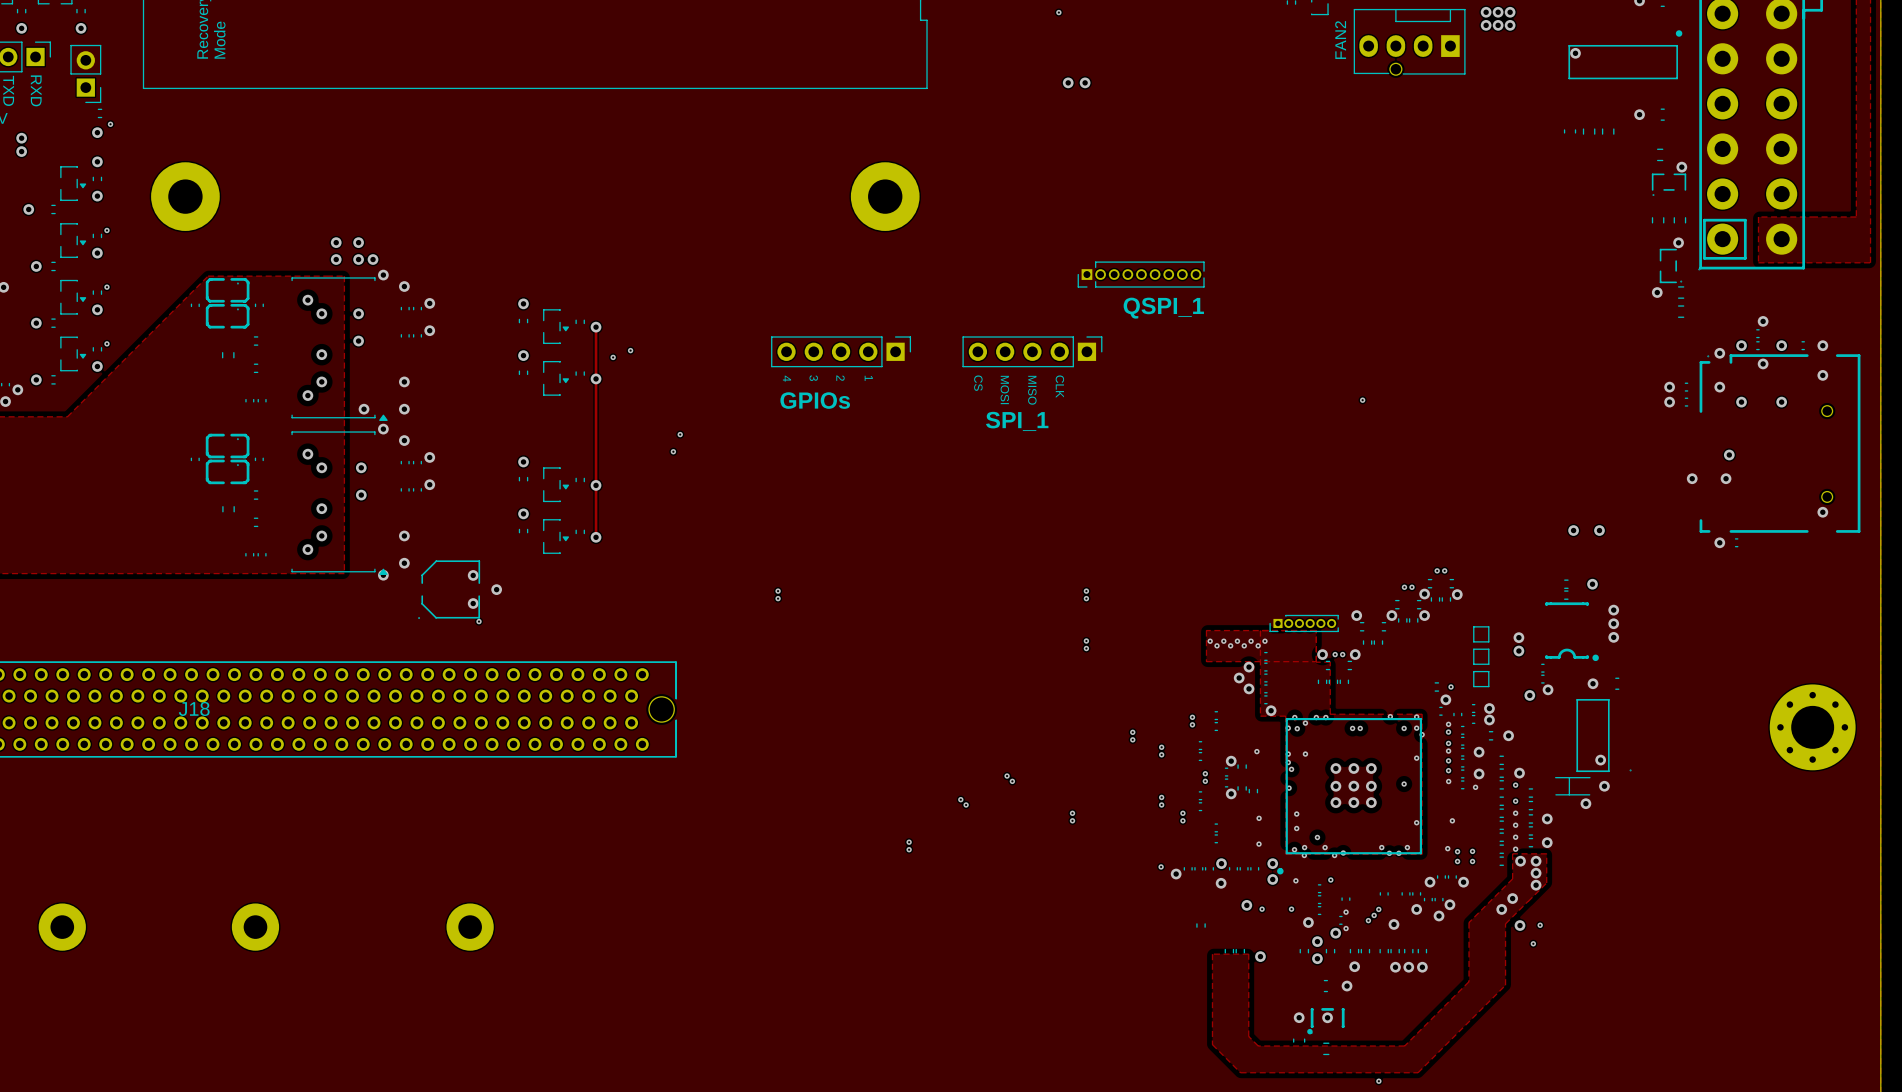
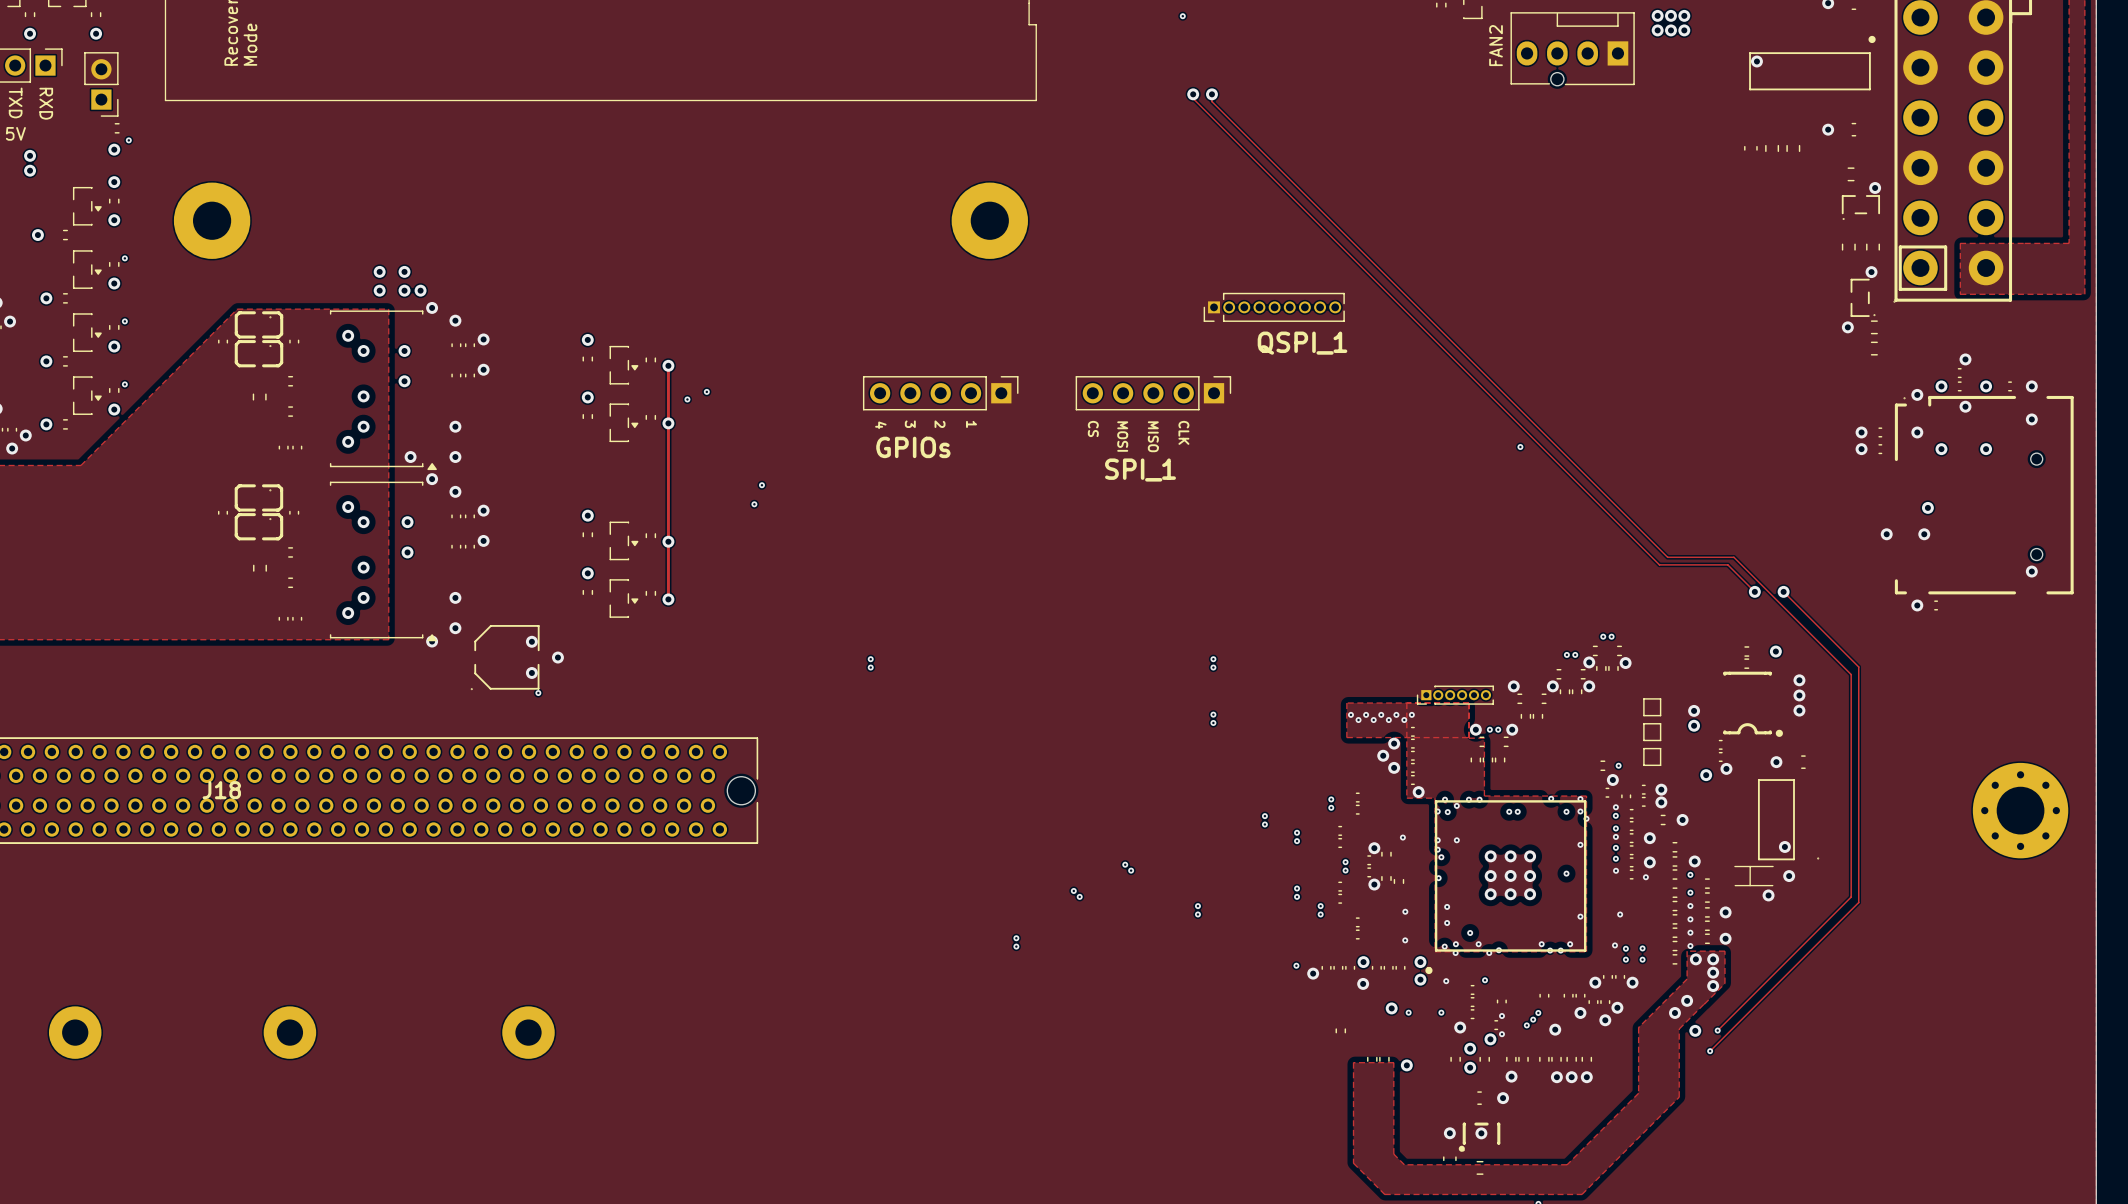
track: none -> (1193, 94) (1193, 98) (1659, 564) (1727, 564) (1754, 591)
track: none -> (1211, 94) (1211, 101) (1667, 557) (1733, 557) (1851, 674) (1851, 897) (1717, 1030)
track: none -> (1783, 591) (1858, 667) (1858, 902) (1710, 1051)

